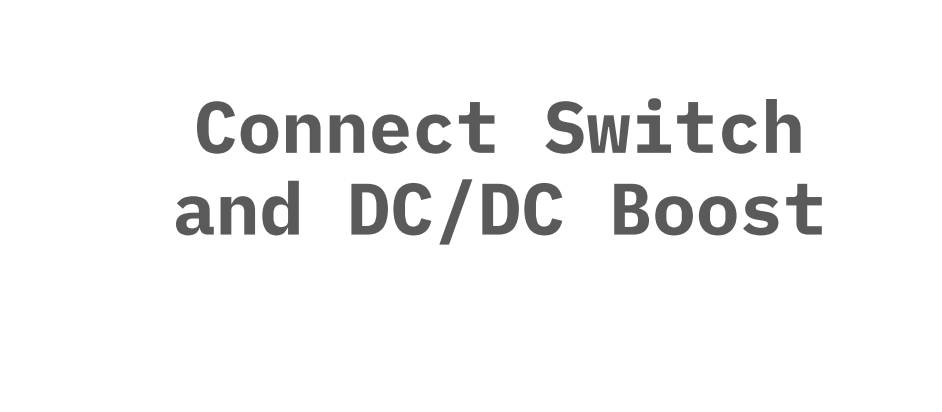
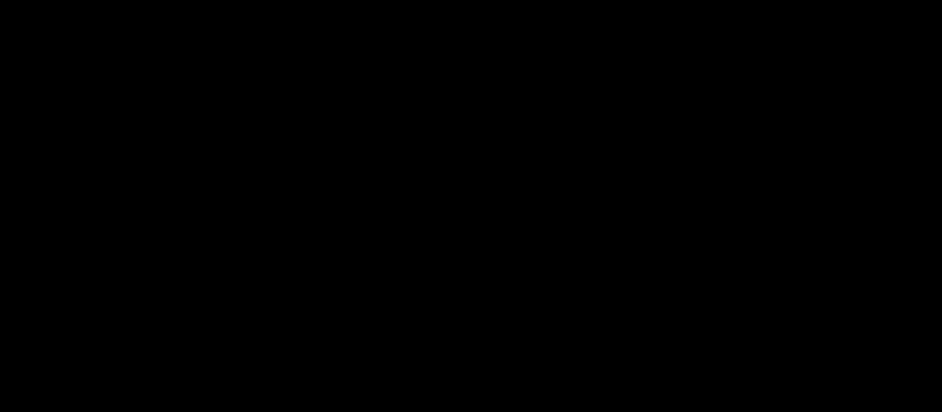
text: Connect Switch (498, 125) -> none
text: and DC/DC Boost (498, 211) -> none

